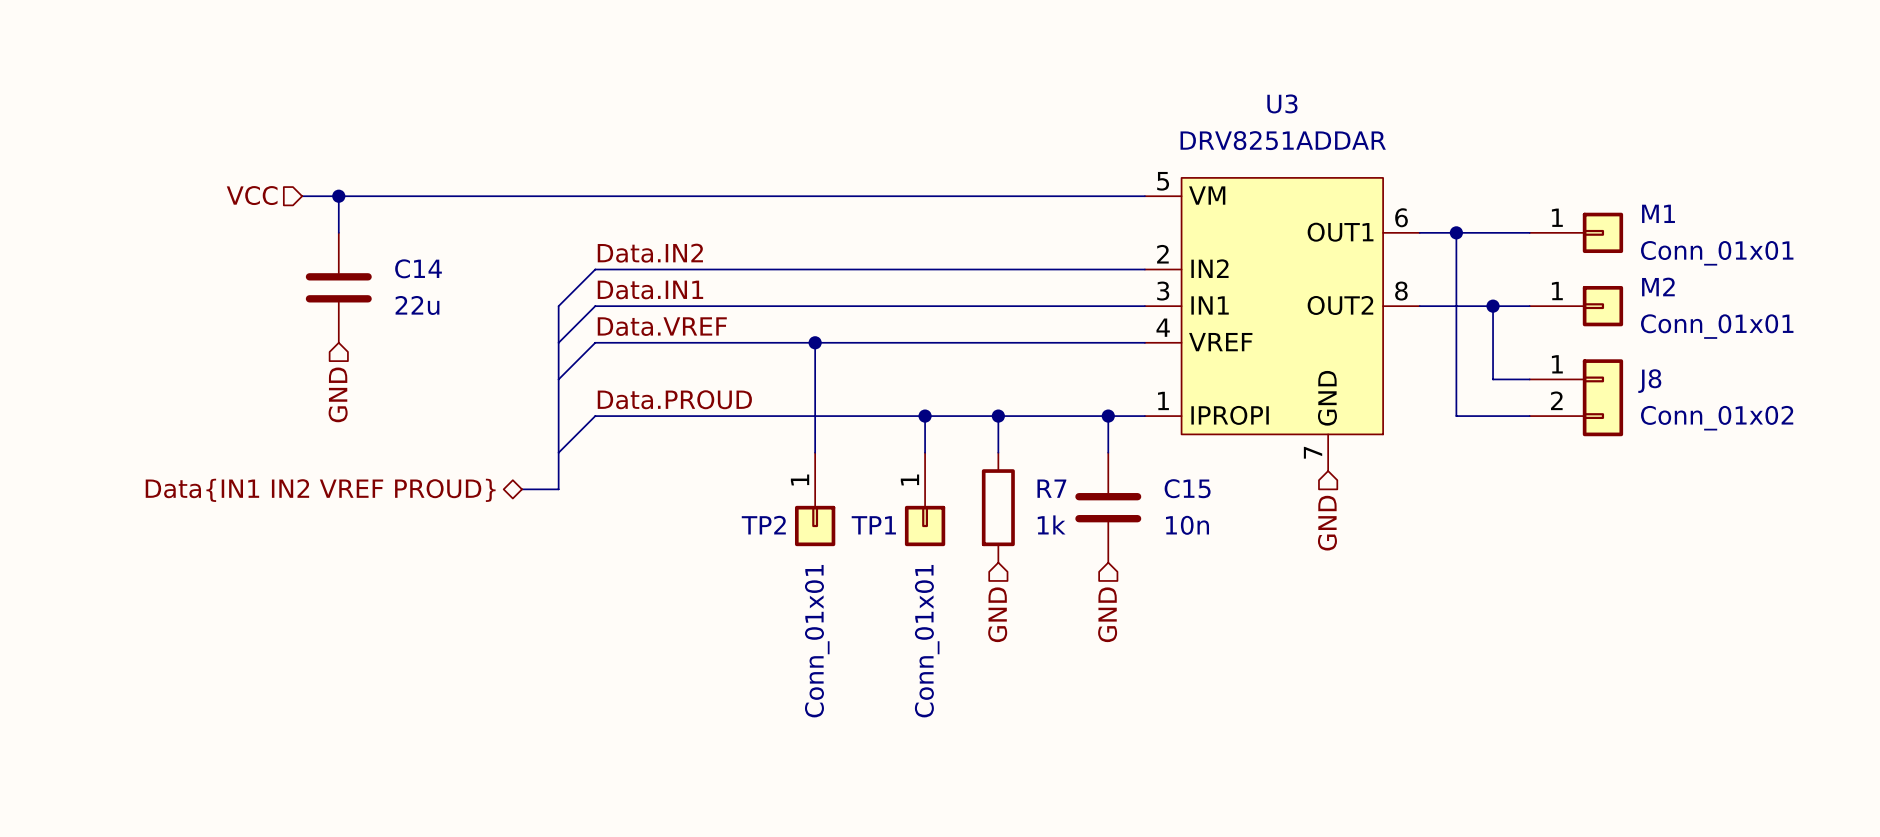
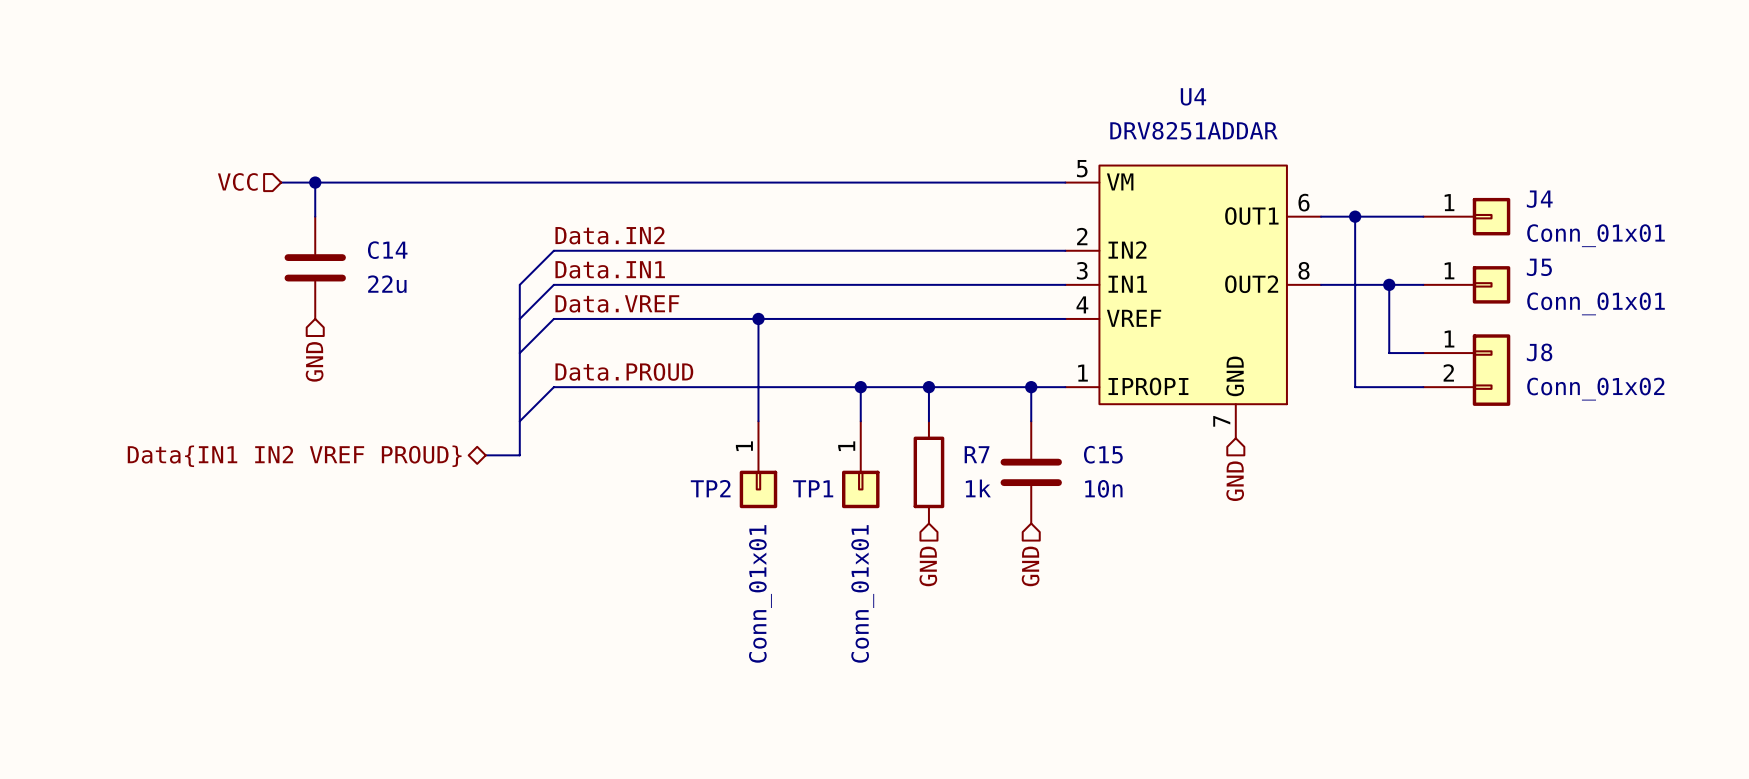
U3 name: U3 (1282, 103) -> U4 (1193, 96)
M1 name: M1 (1658, 213) -> J4 (1539, 199)
M2 name: M2 (1658, 286) -> J5 (1539, 267)

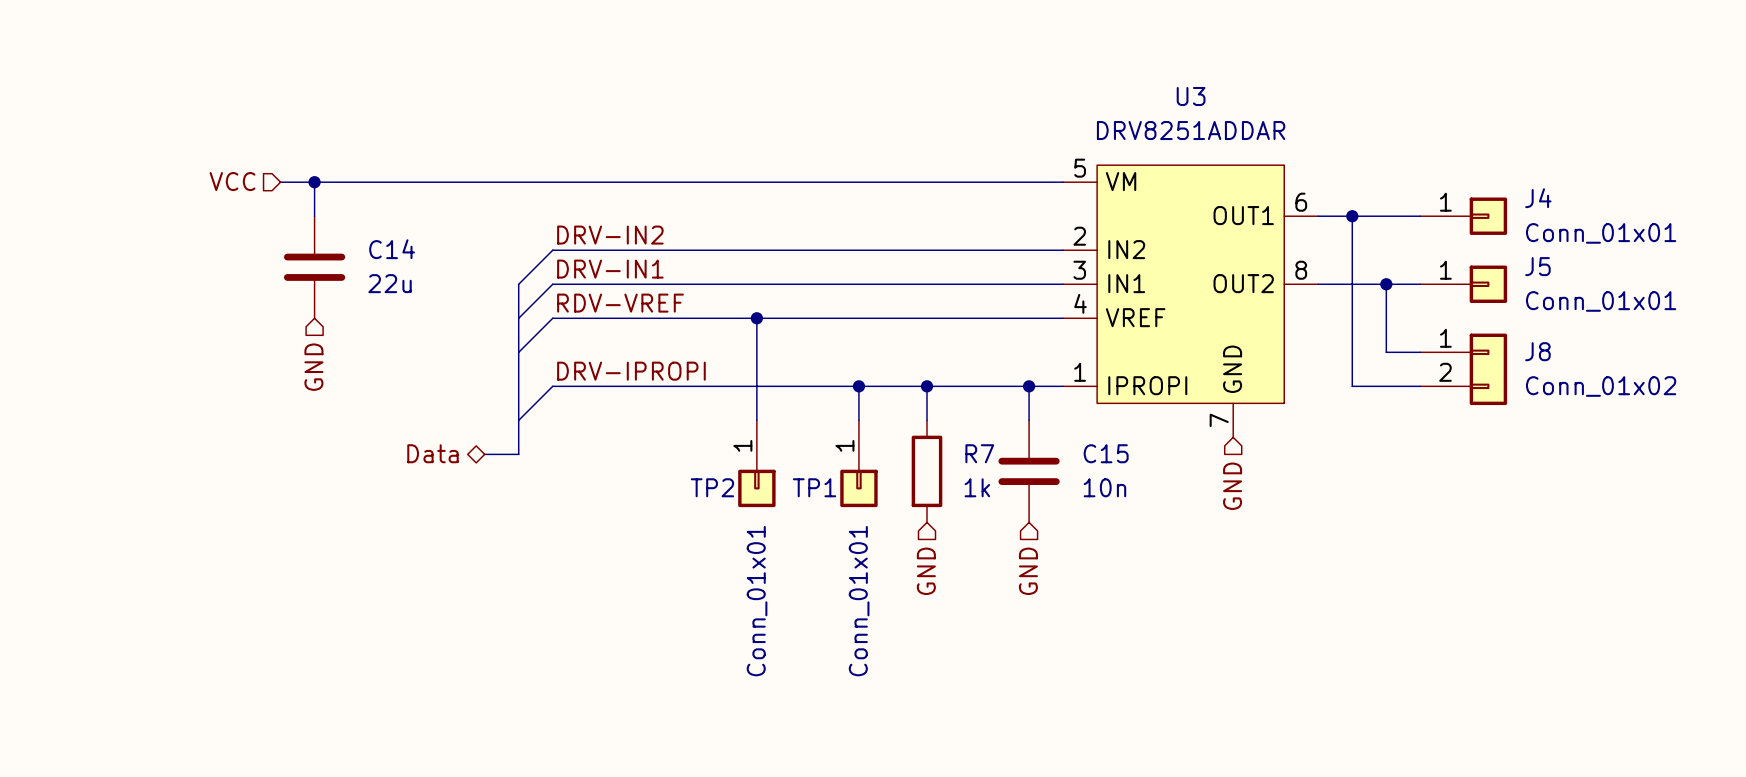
U4 name: U4 (1193, 96) -> U3 (1191, 96)
label: Data.IN2 (610, 235) -> DRV-IN2 (610, 235)
label: Data.IN1 (610, 269) -> DRV-IN1 (610, 269)
label: Data.VREF (617, 303) -> RDV-VREF (620, 303)
label: Data.PROUD (624, 371) -> DRV-IPROPI (631, 371)
hierarchical label: Data{IN1 IN2 VREF PROUD} (294, 456) -> Data (432, 453)

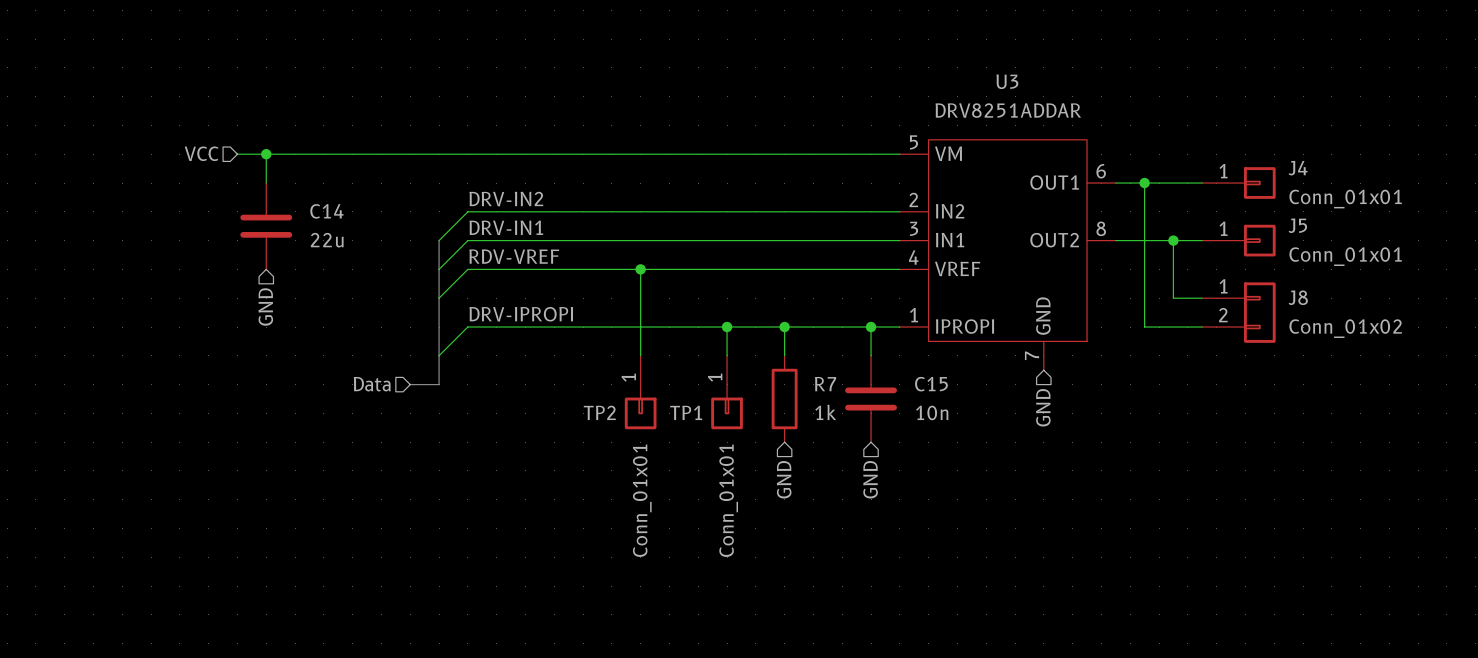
hierarchical label shape: bidirectional (432, 453) -> input (372, 384)

